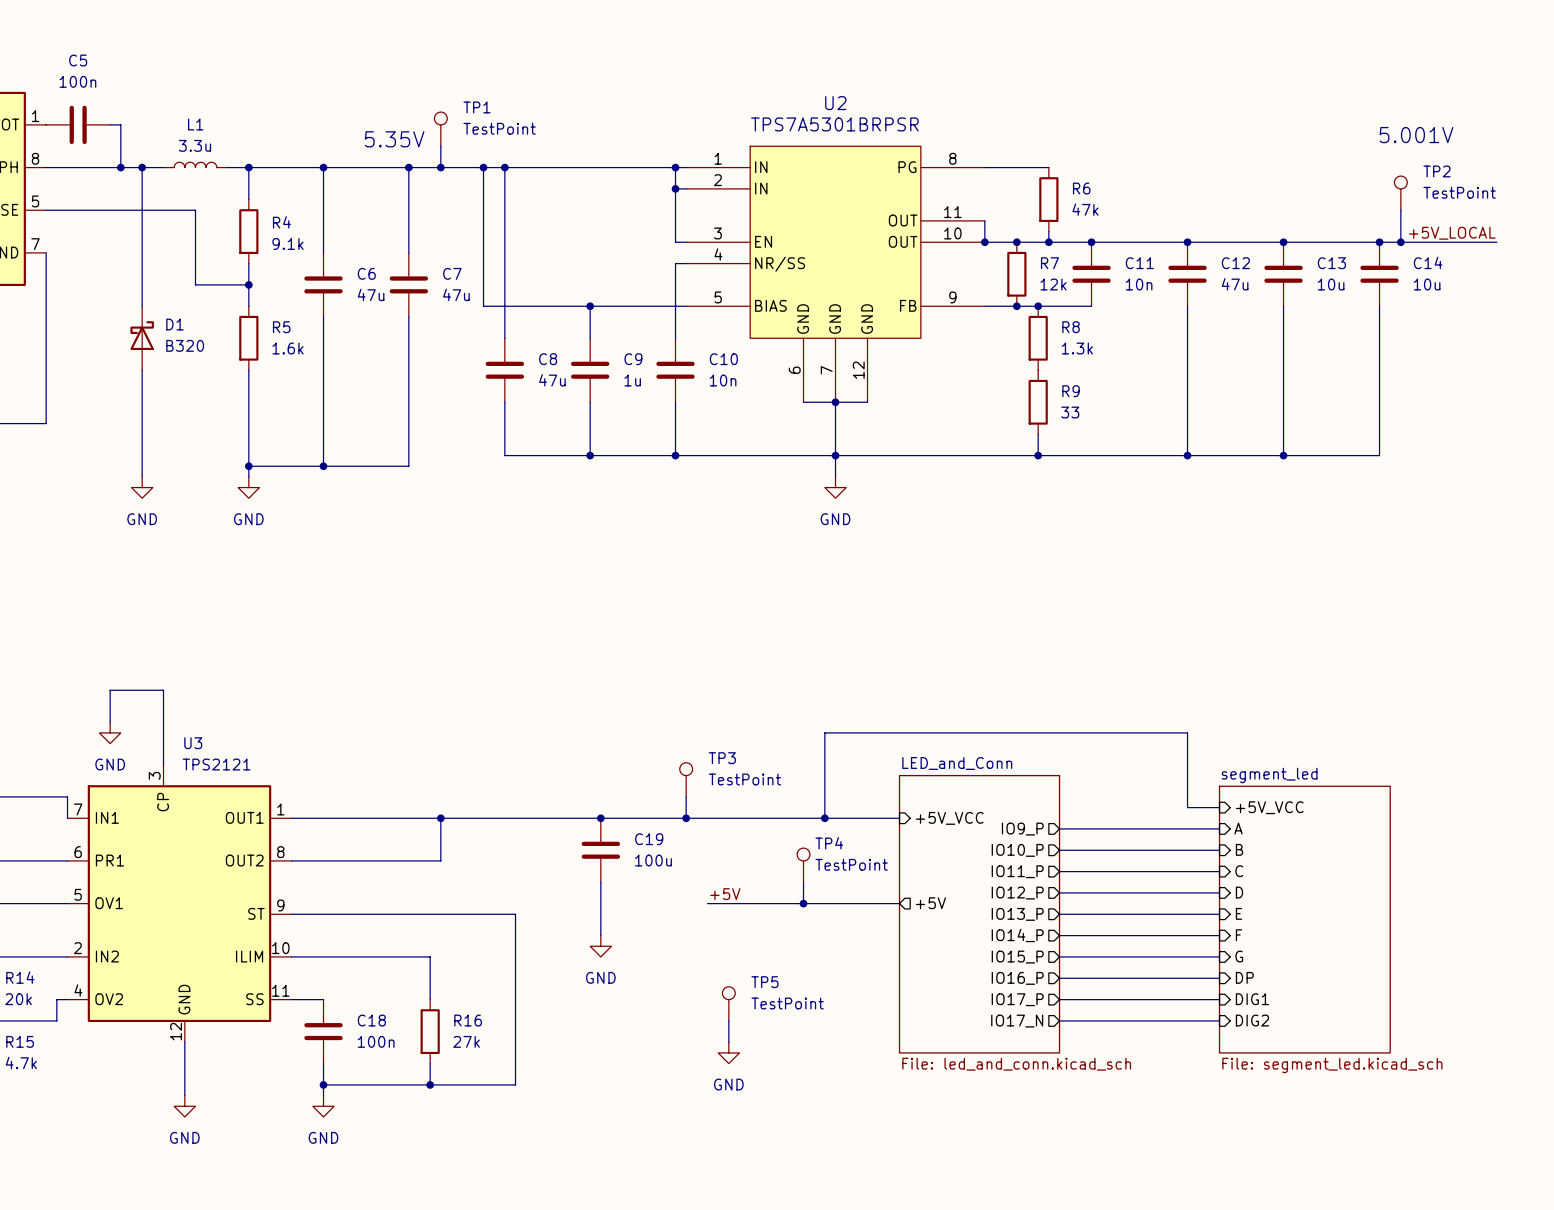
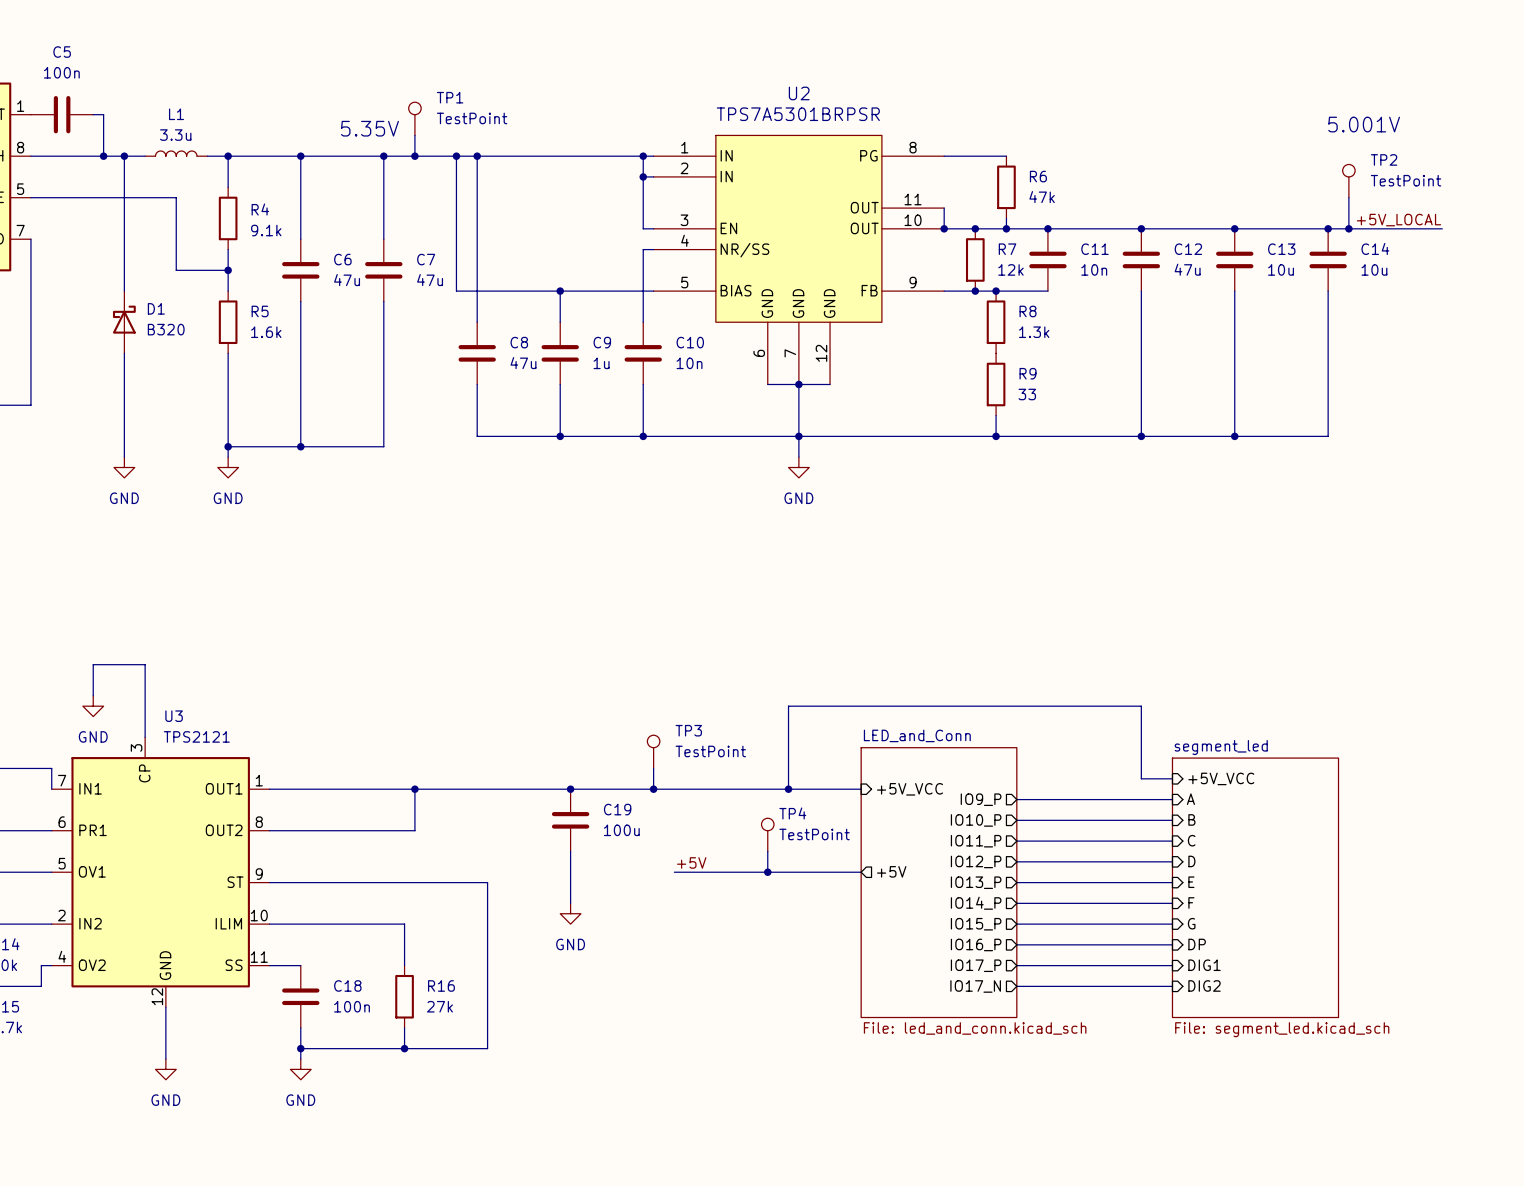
TP5: TestPoint (728, 1003) -> none
wire: (728, 1020) (728, 1042) -> none
power symbol: GND (728, 1052) -> none

